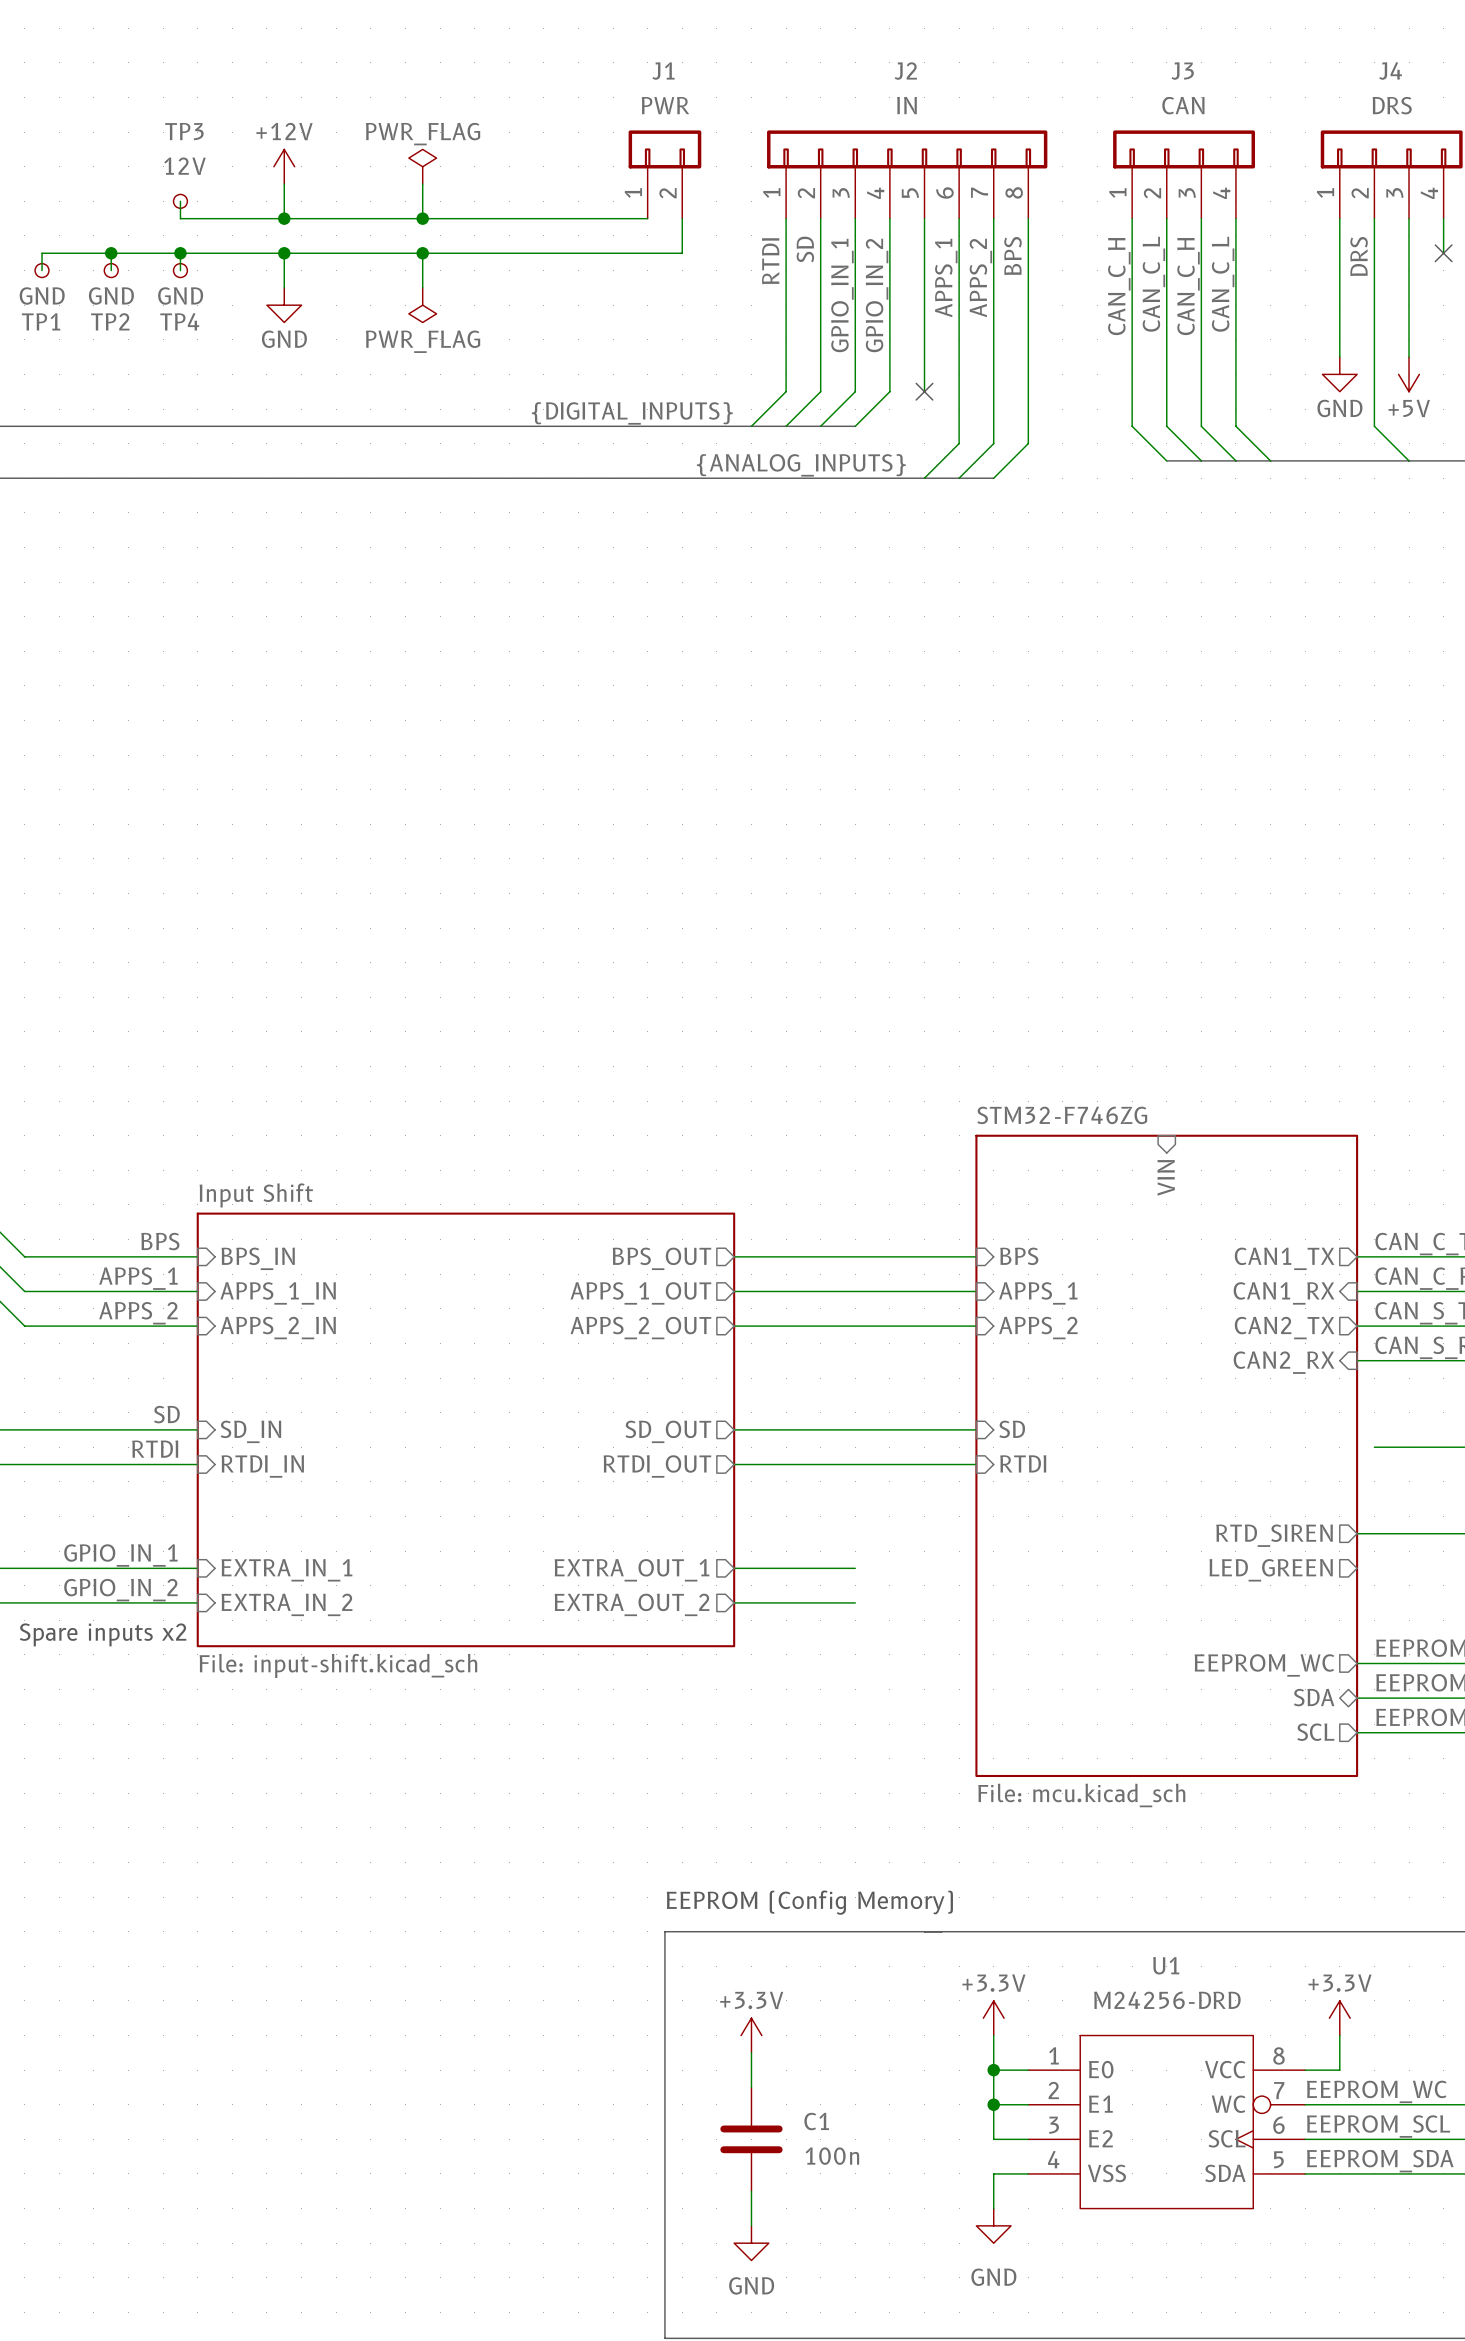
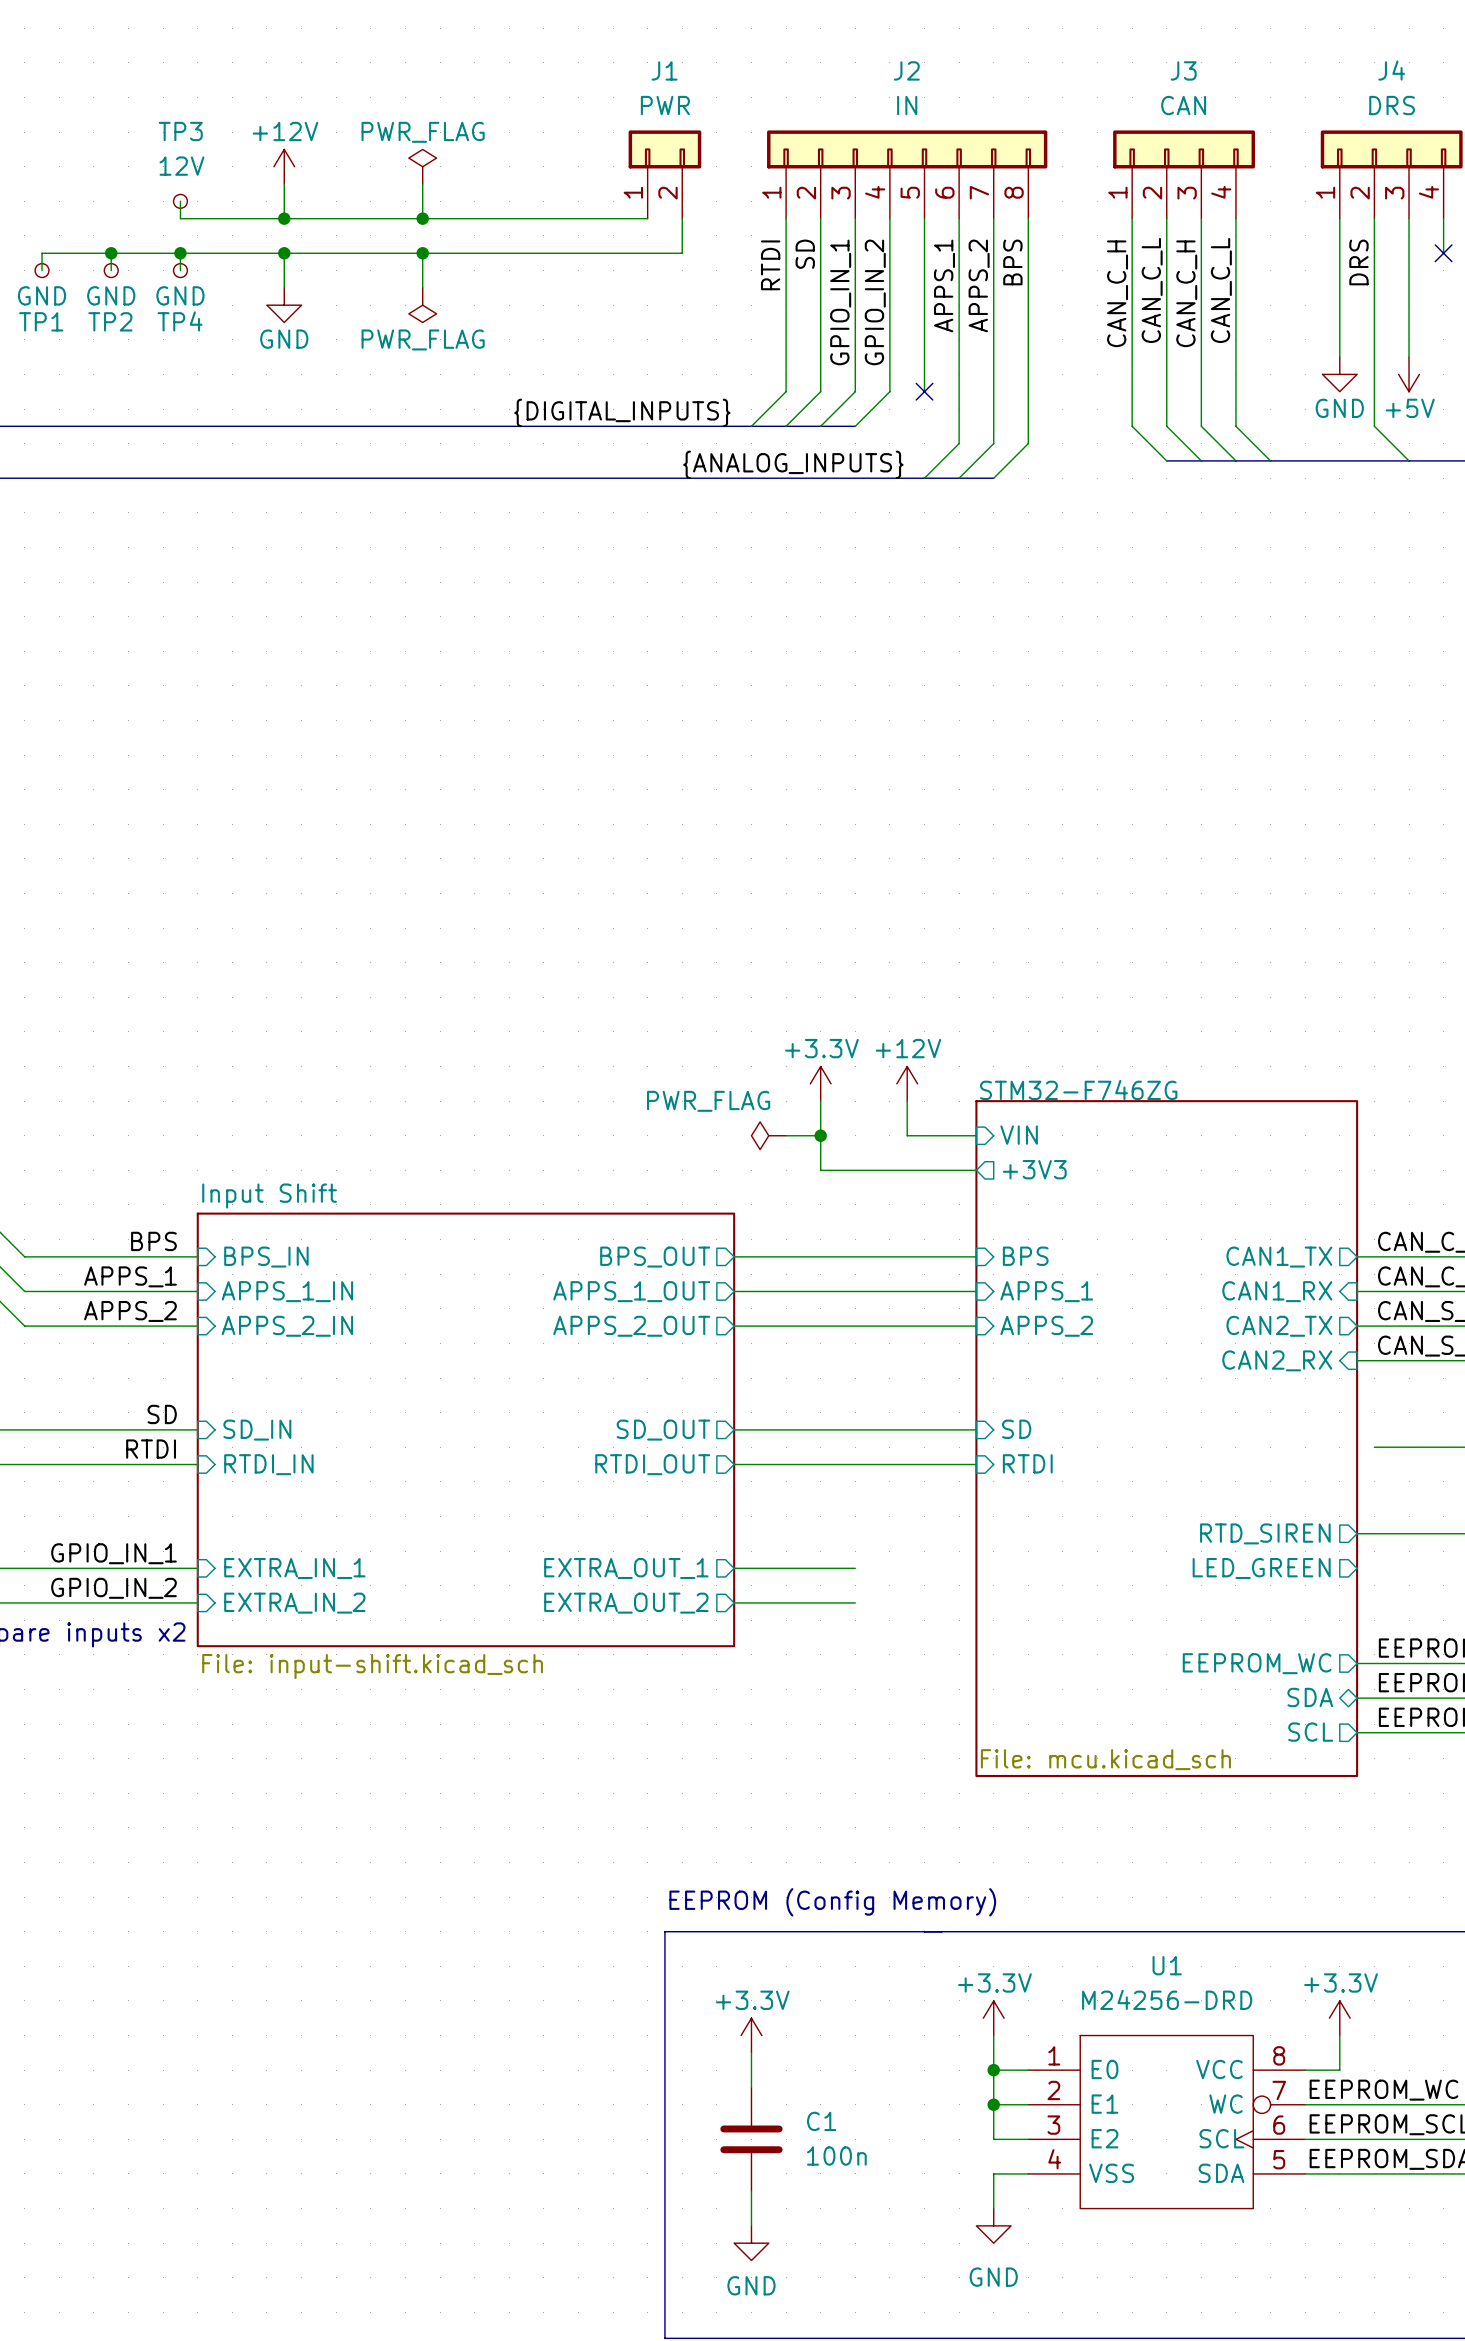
power symbol: none -> +3.3V (820, 1083)
power symbol: none -> +12V (907, 1083)
wire: none -> (820, 1101) (820, 1170) (976, 1170)
wire: none -> (907, 1101) (907, 1135) (976, 1135)
sheet STM32-F746ZG shape: [975, 1134, 1359, 1778] -> [975, 1100, 1359, 1778]
power symbol: none -> PWR_FLAG (768, 1135)
wire: none -> (786, 1135) (820, 1135)
junction: none -> (820, 1135)
sheet pin: none -> +3V3 (1034, 1169)
sheet pin rotation: 0° (1166, 1177) -> 90° counterclockwise (1019, 1135)
sheet pin position: VIN (1166, 1177) -> VIN (1019, 1135)

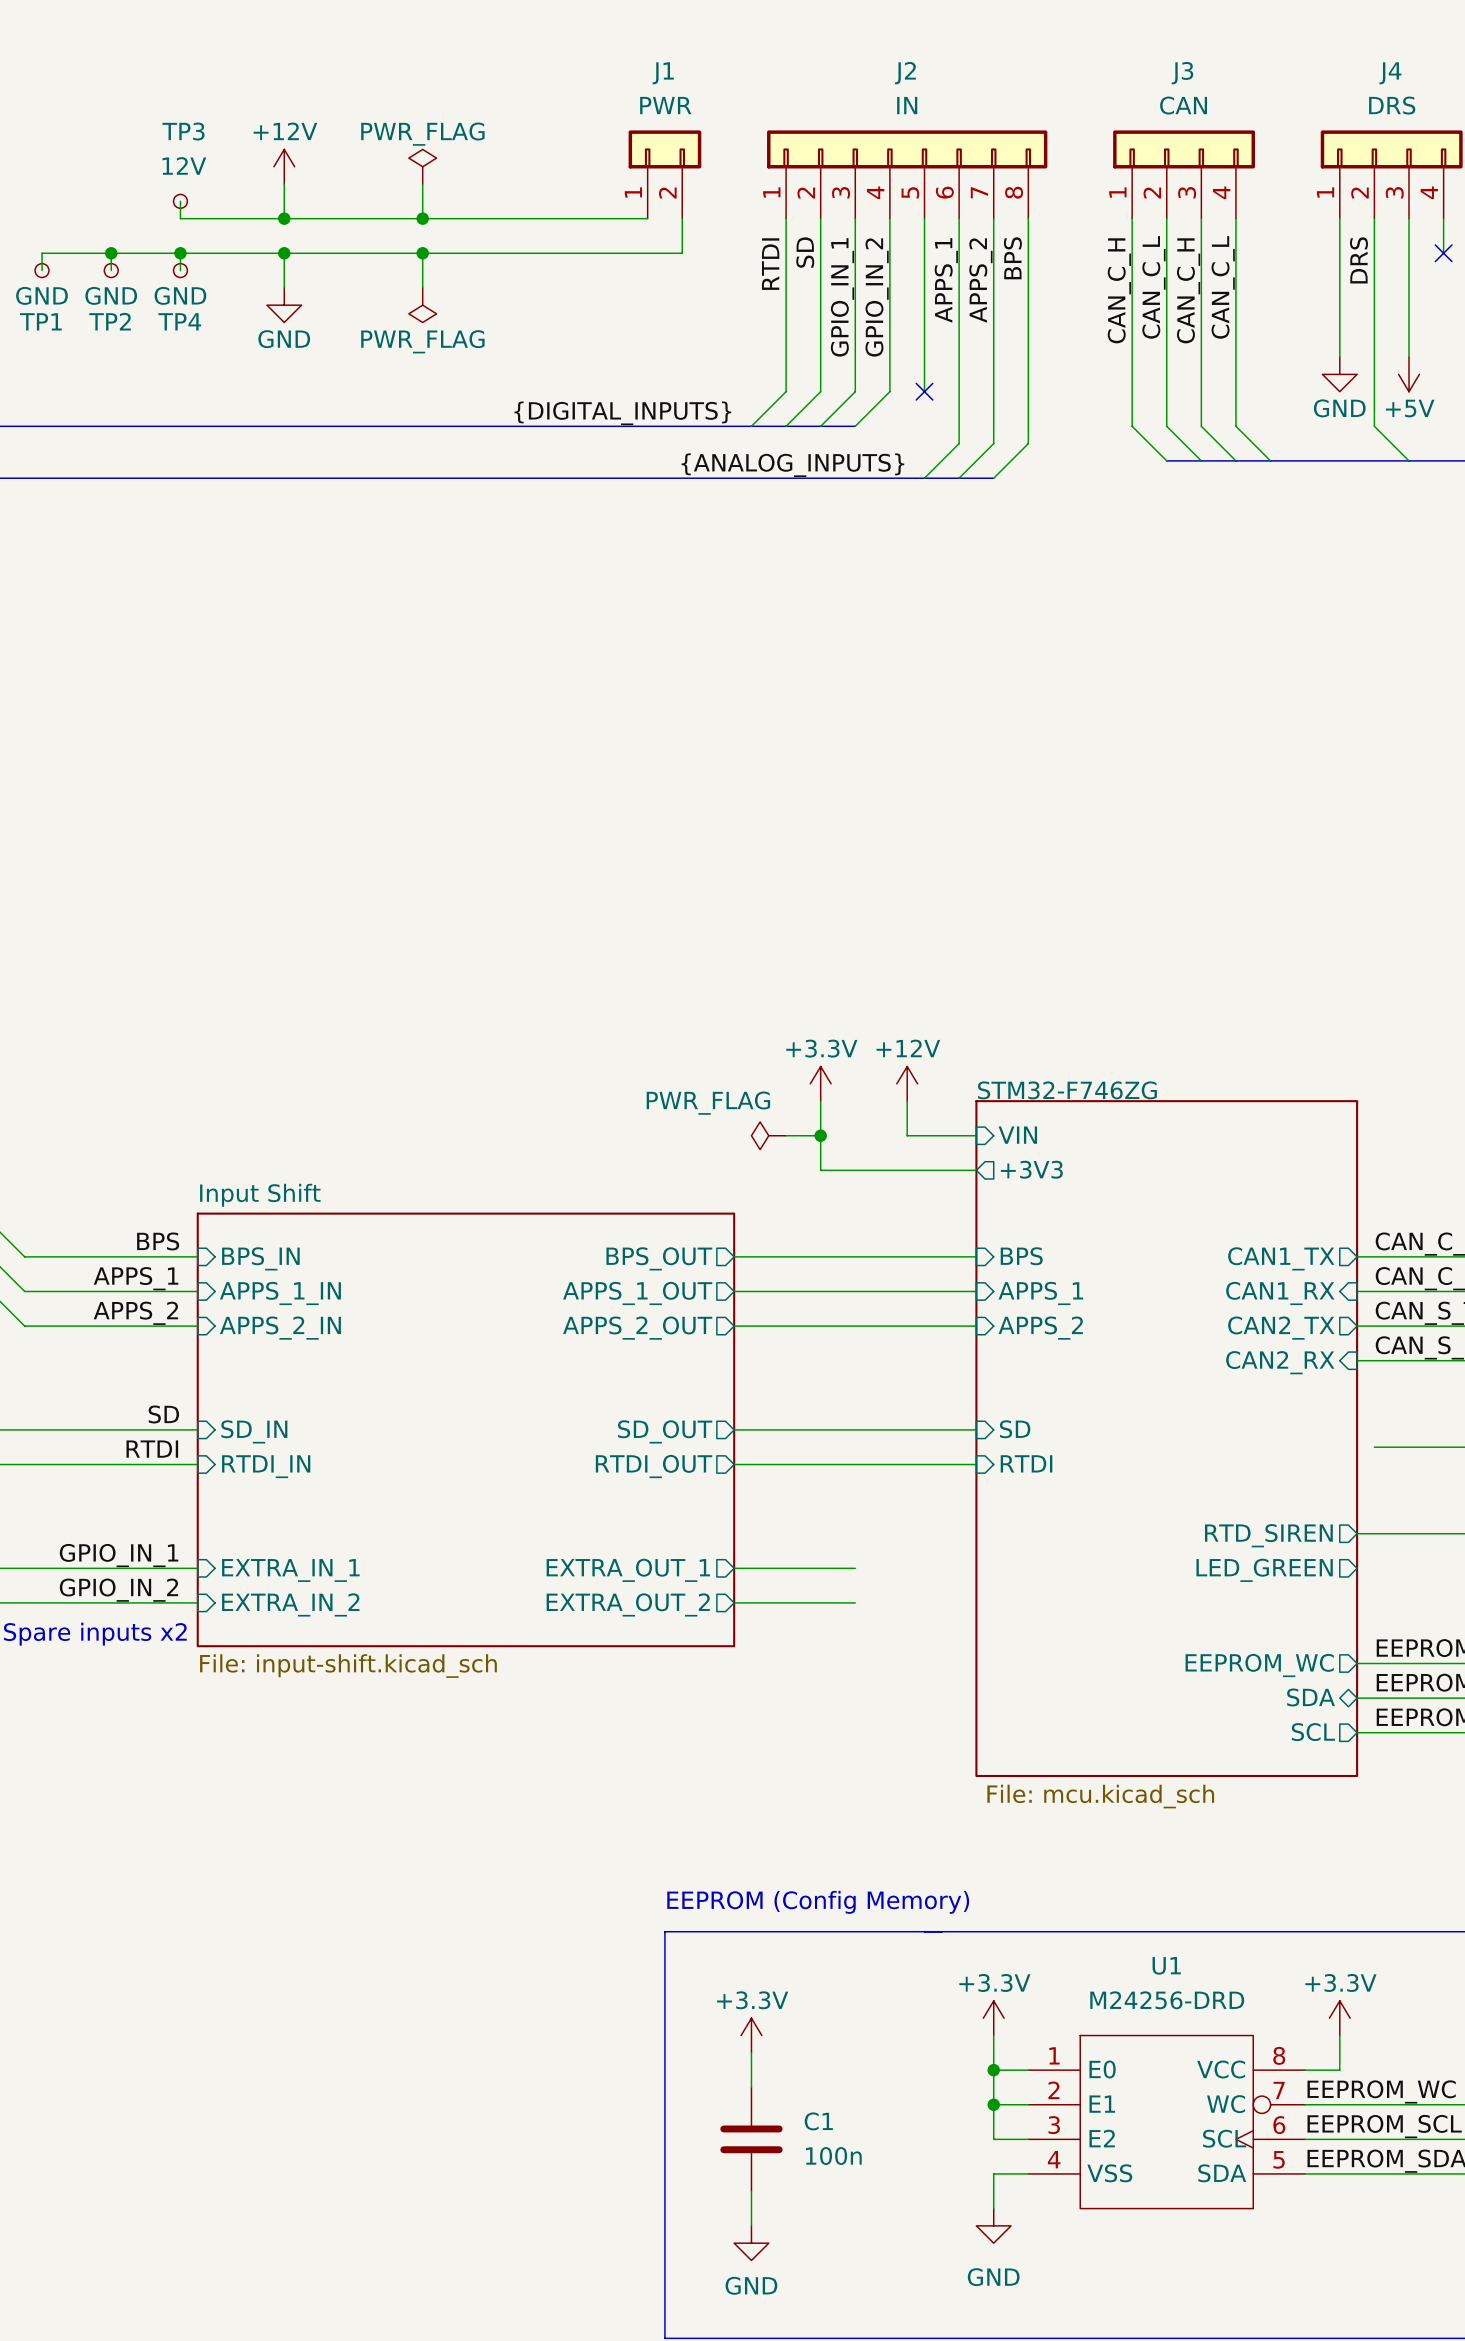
sheet STM32-F746ZG value position: File: mcu.kicad_sch (1105, 1759) -> File: mcu.kicad_sch (1100, 1796)

